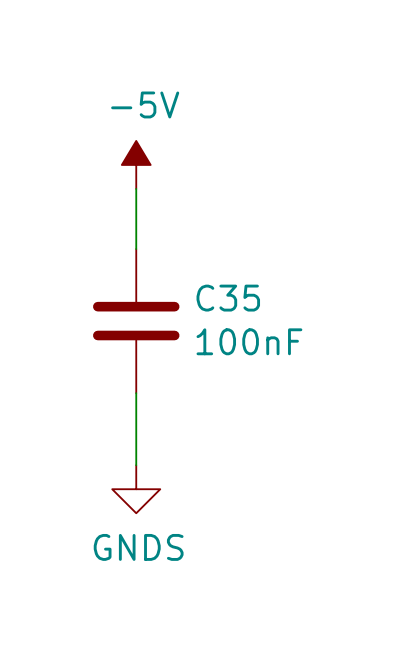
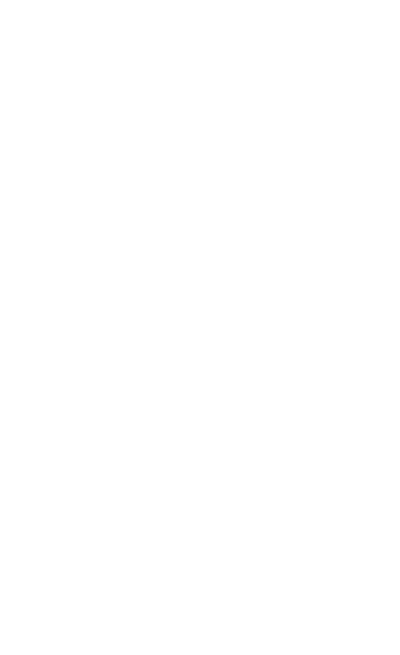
power symbol: -5V (136, 164) -> none
wire: (136, 188) (136, 249) -> none
C35: 100nF (136, 321) -> none
wire: (136, 393) (136, 465) -> none
power symbol: GNDS (136, 489) -> none

